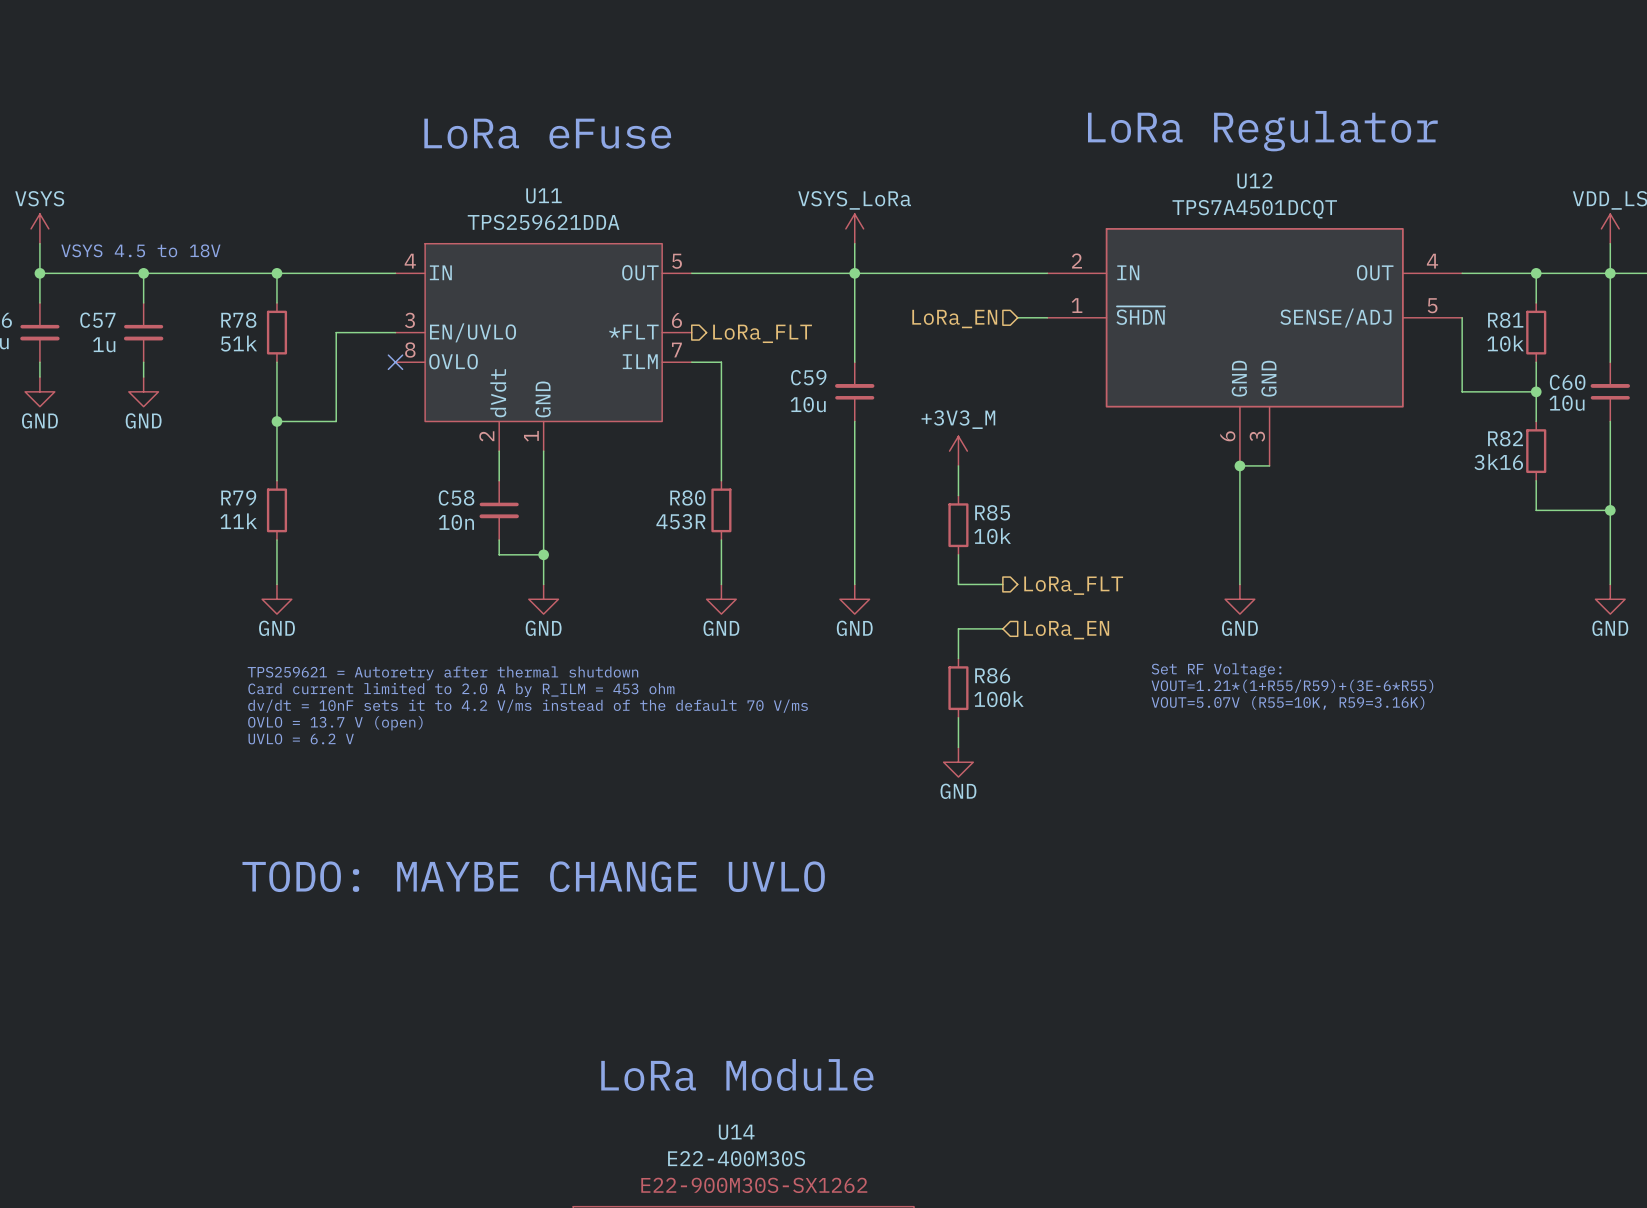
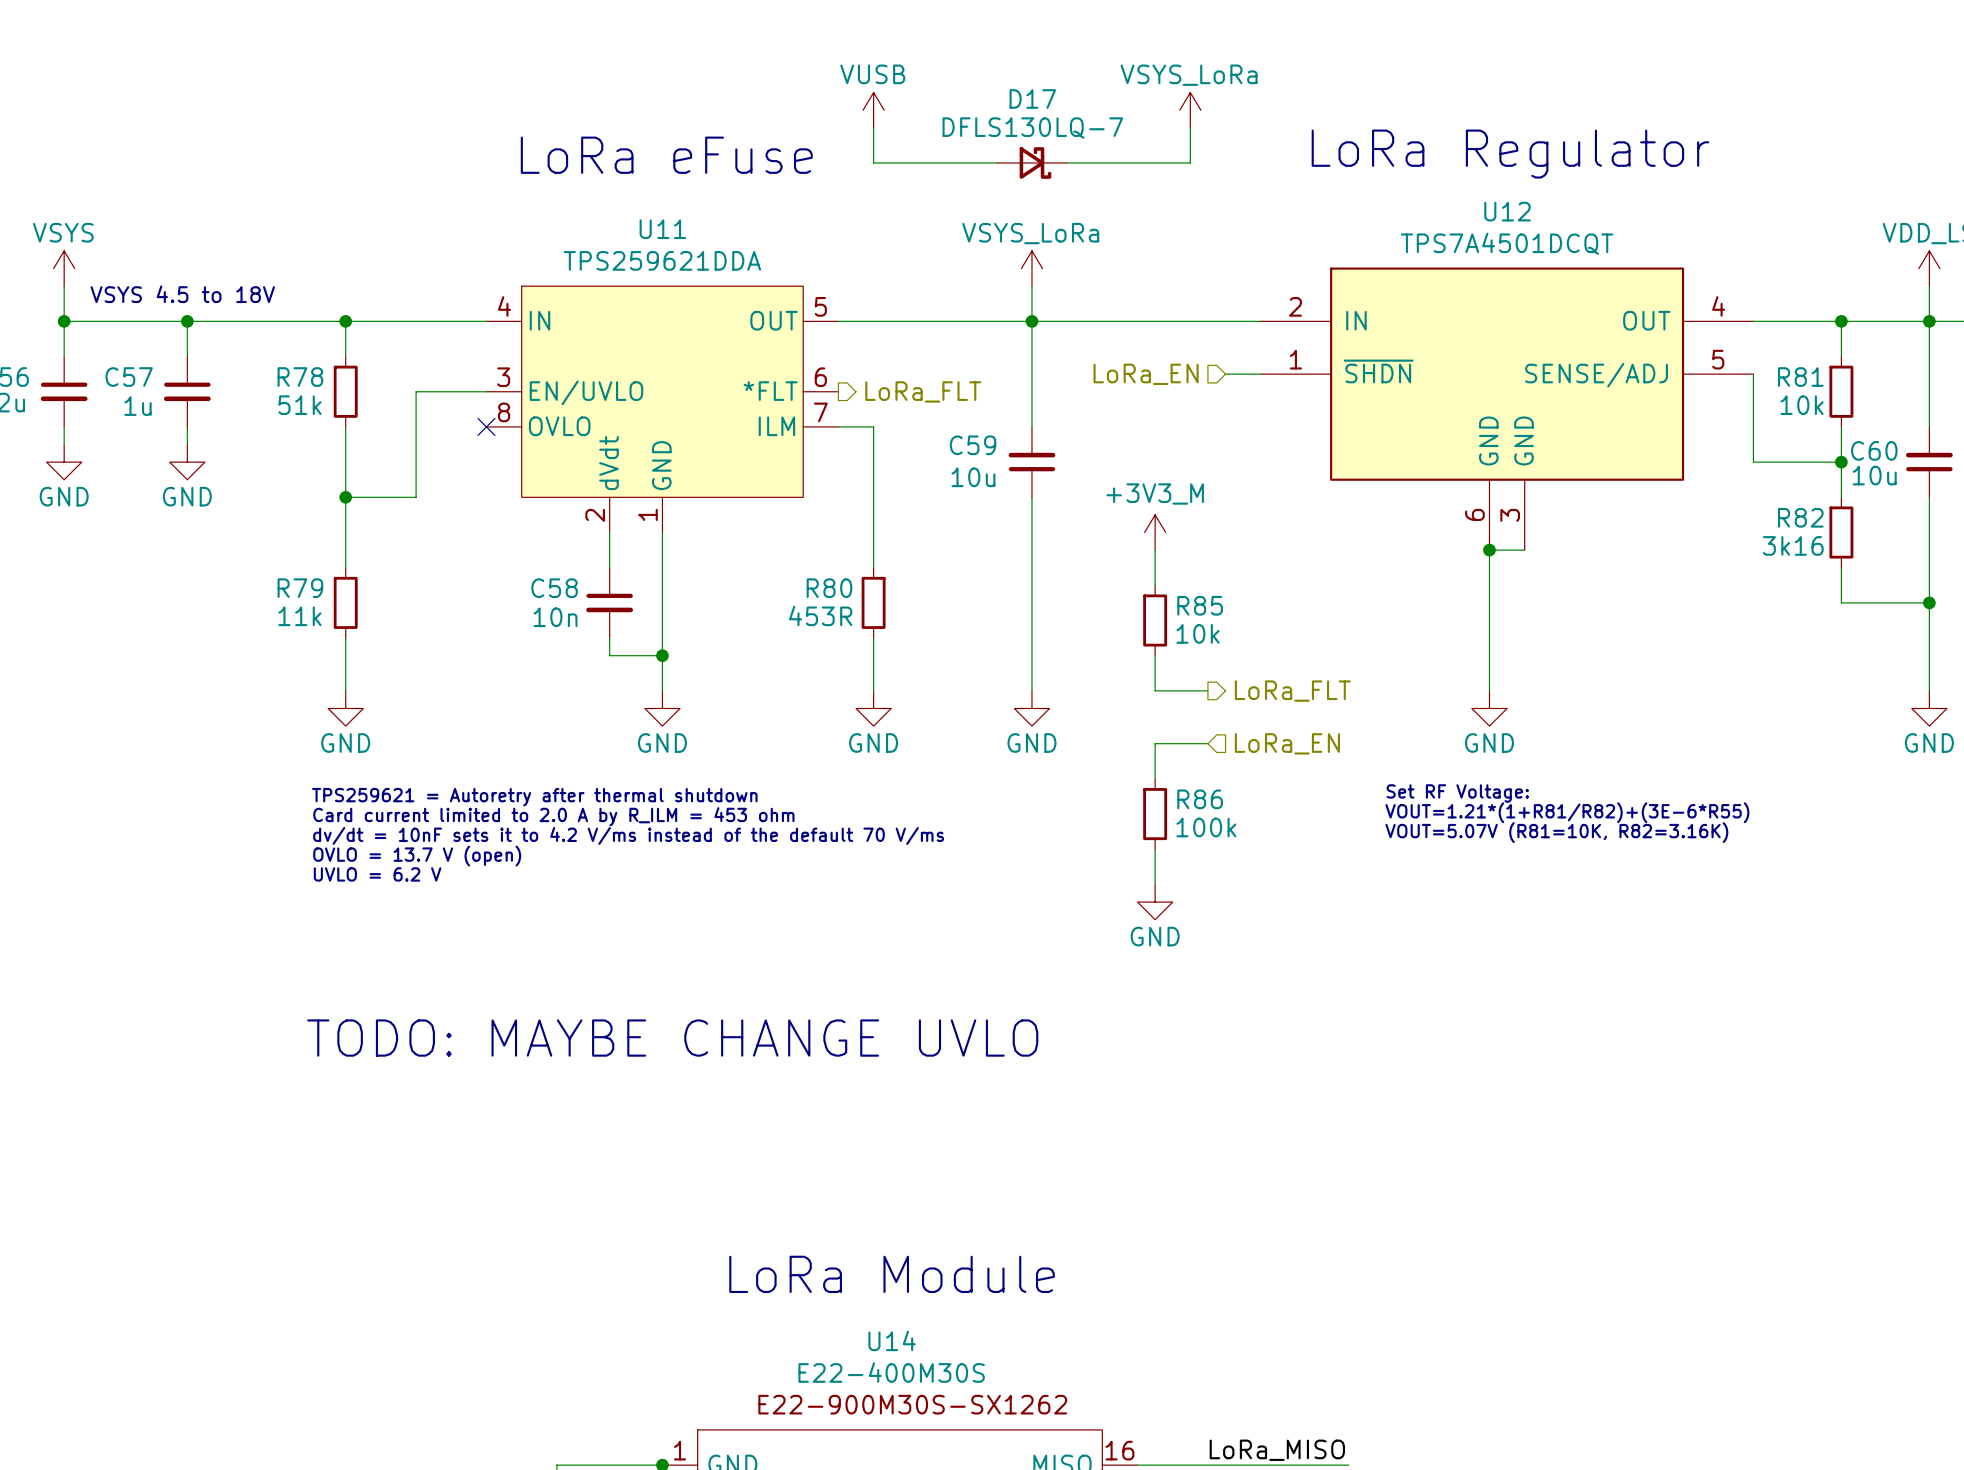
power symbol: none -> VUSB (873, 110)
power symbol: none -> VSYS_LoRa (1190, 110)
wire: none -> (873, 127) (873, 163) (996, 163)
wire: none -> (1190, 127) (1190, 163) (1067, 163)
D17: none -> DFLS130LQ-7 (1031, 163)
text: VOUT=1.21*(1+R55/R59)+(3E-6*R55) (1292, 686) -> VOUT=1.21*(1+R81/R82)+(3E-6*R55) (1567, 812)
text: VOUT=5.07V (R55=10K, R59=3.16K) (1287, 703) -> VOUT=5.07V (R81=10K, R82=3.16K) (1556, 832)

